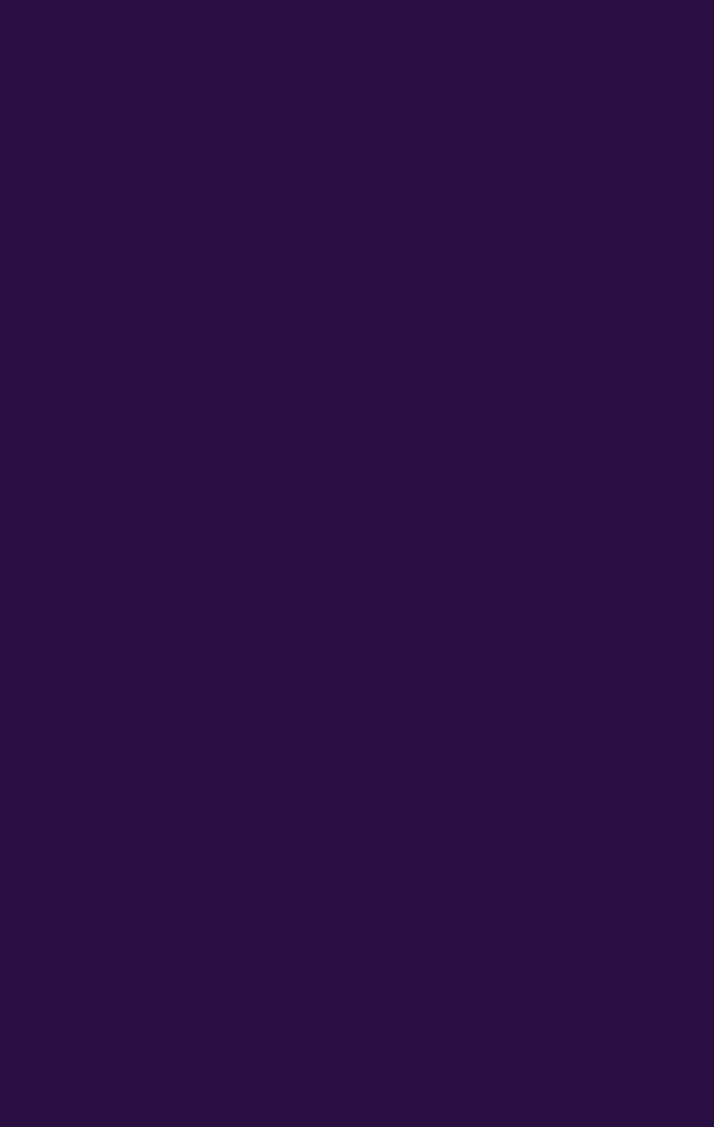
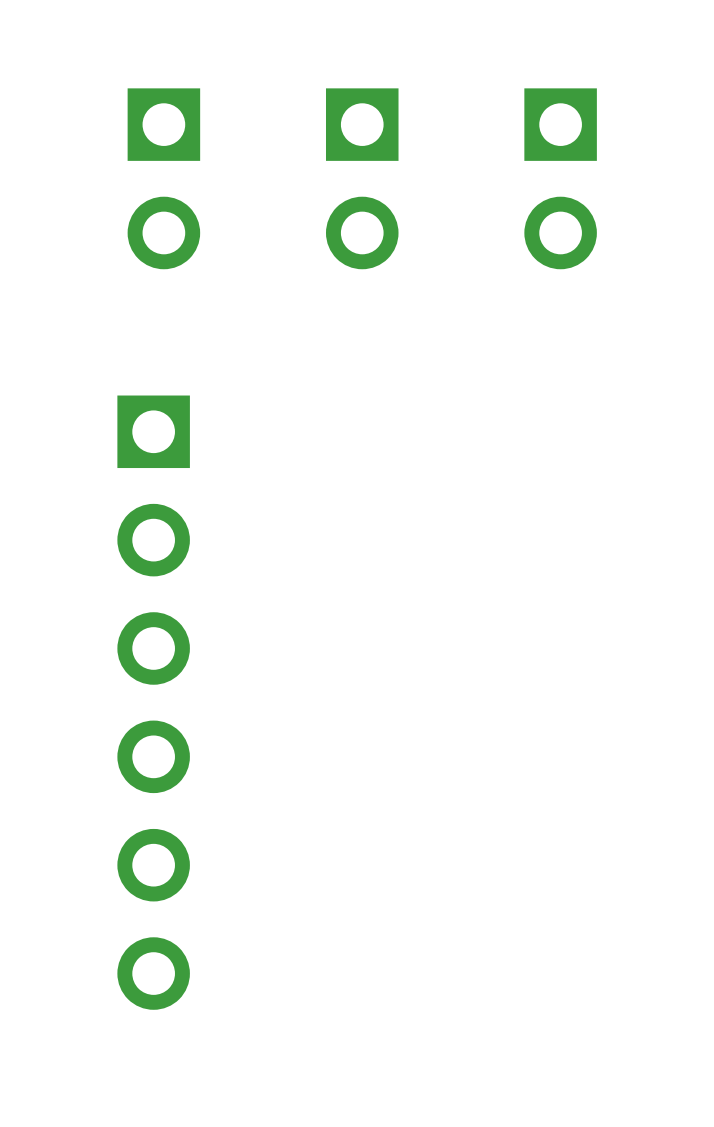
part: none -> (163, 178)
part: none -> (362, 178)
part: none -> (560, 178)
part: none -> (153, 702)

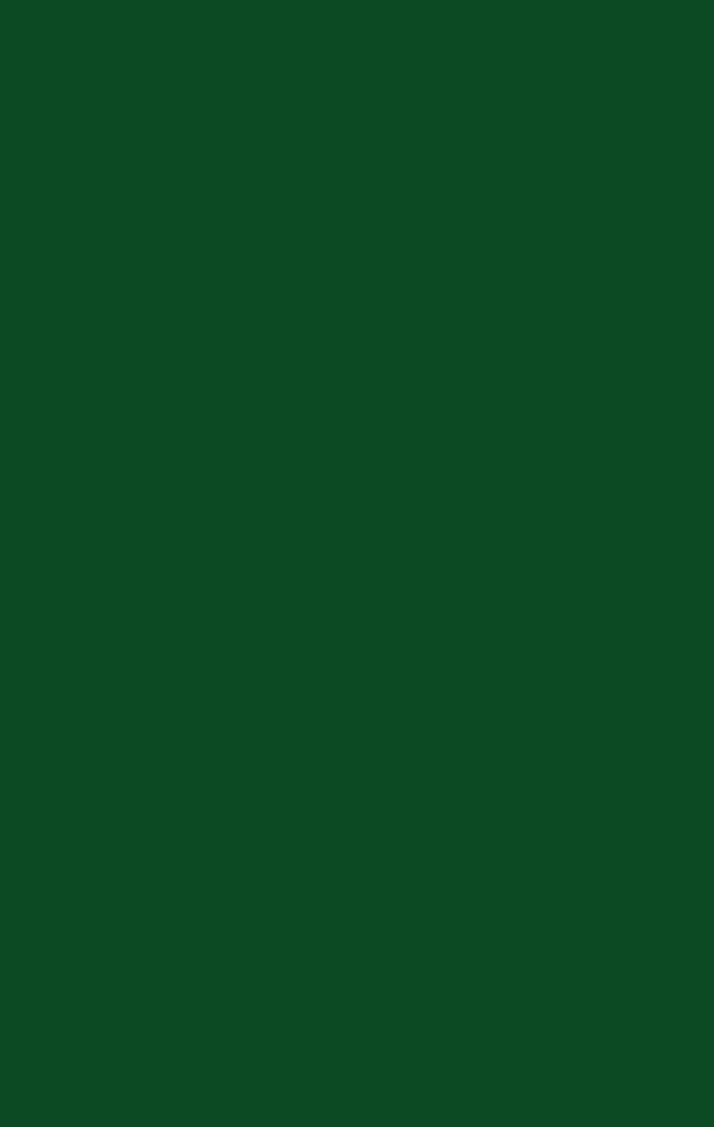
part: (163, 178) -> none
part: (362, 178) -> none
part: (560, 178) -> none
part: (153, 702) -> none

